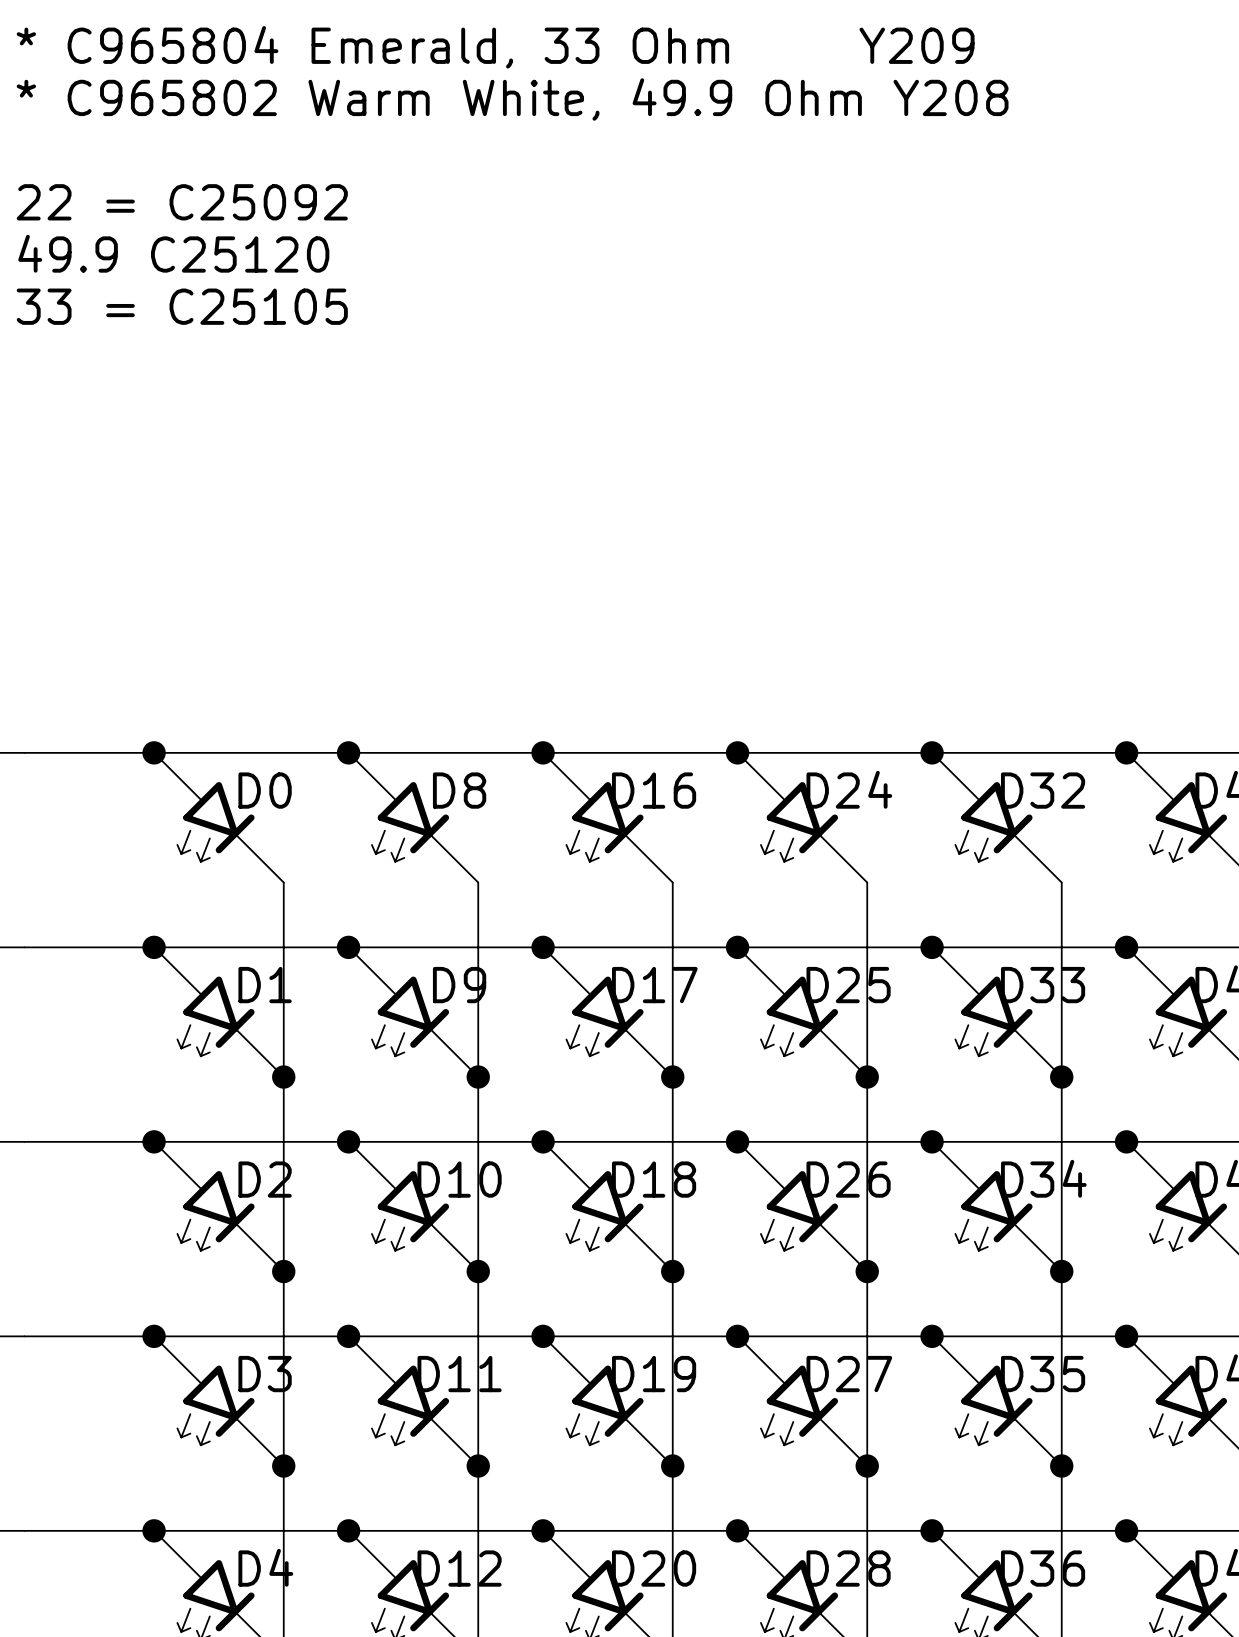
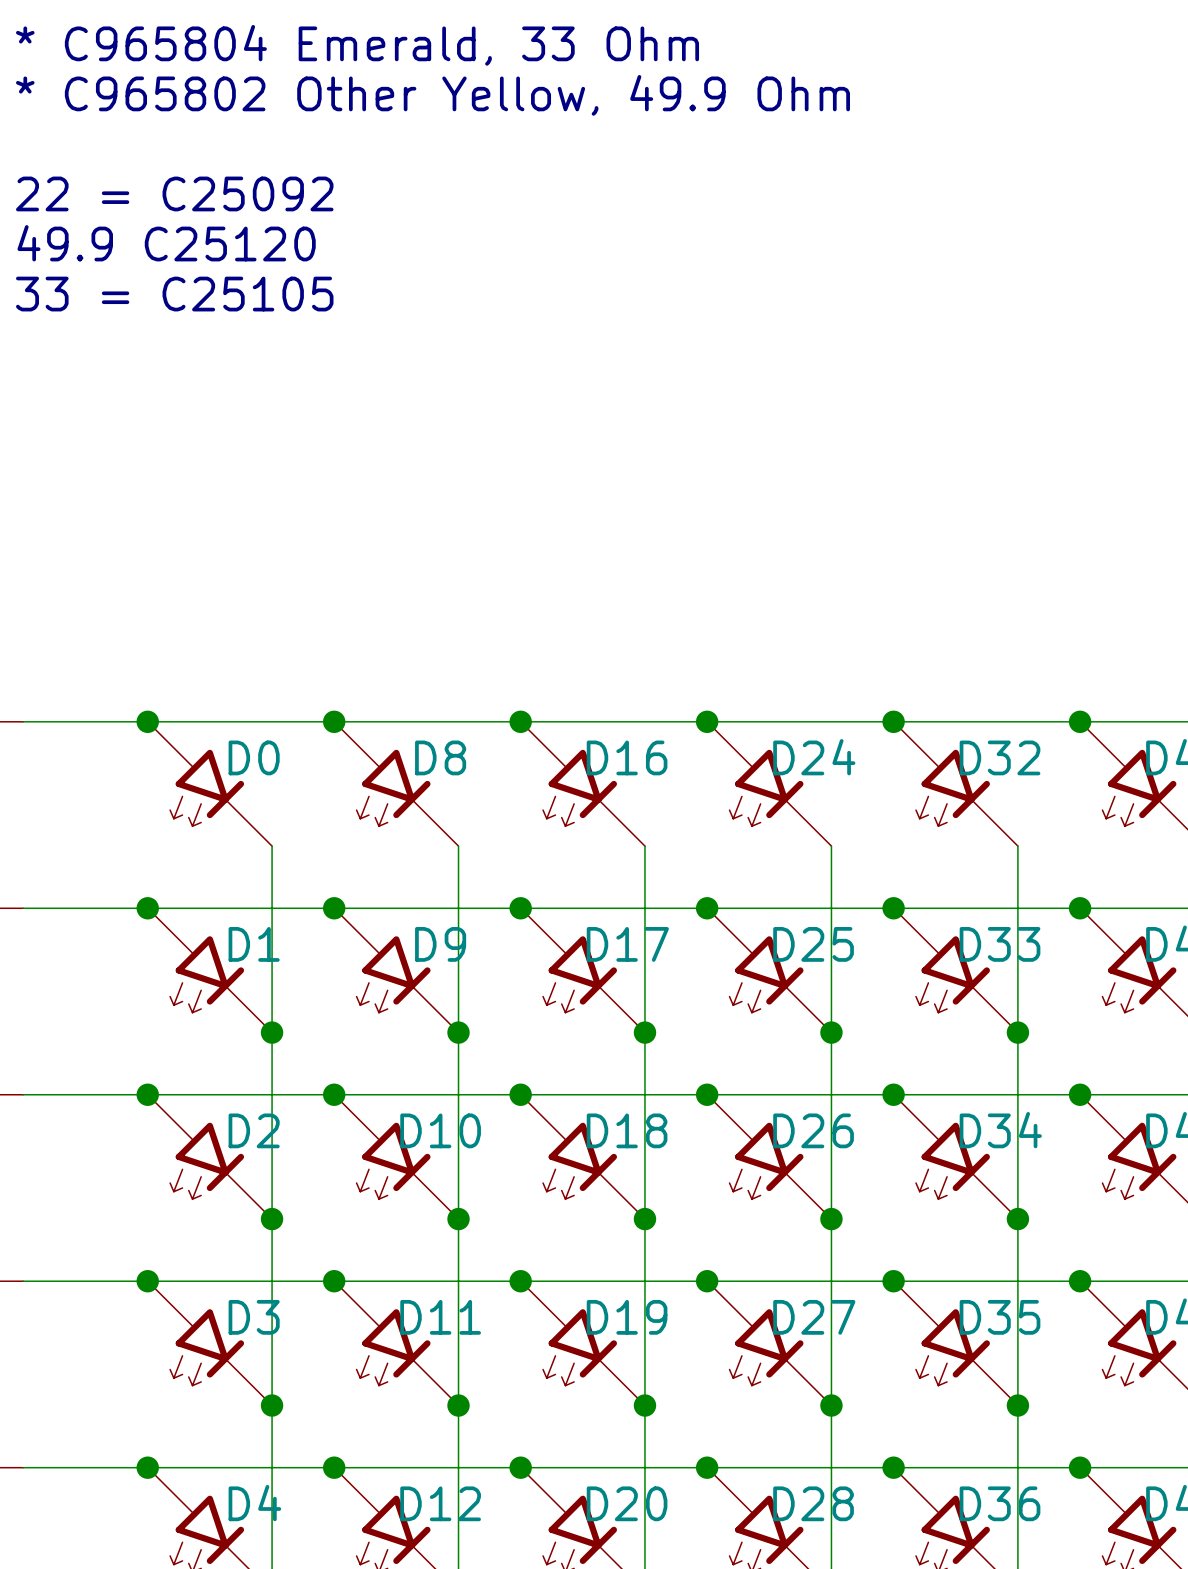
text: * C965804 Emerald, 33 Ohm Y209 (495, 47) -> * C965804 Emerald, 33 Ohm (357, 45)
text: * C965802 Warm White, 49.9 Ohm Y208 (512, 99) -> * C965802 Other Yellow, 49.9 Ohm (432, 95)

